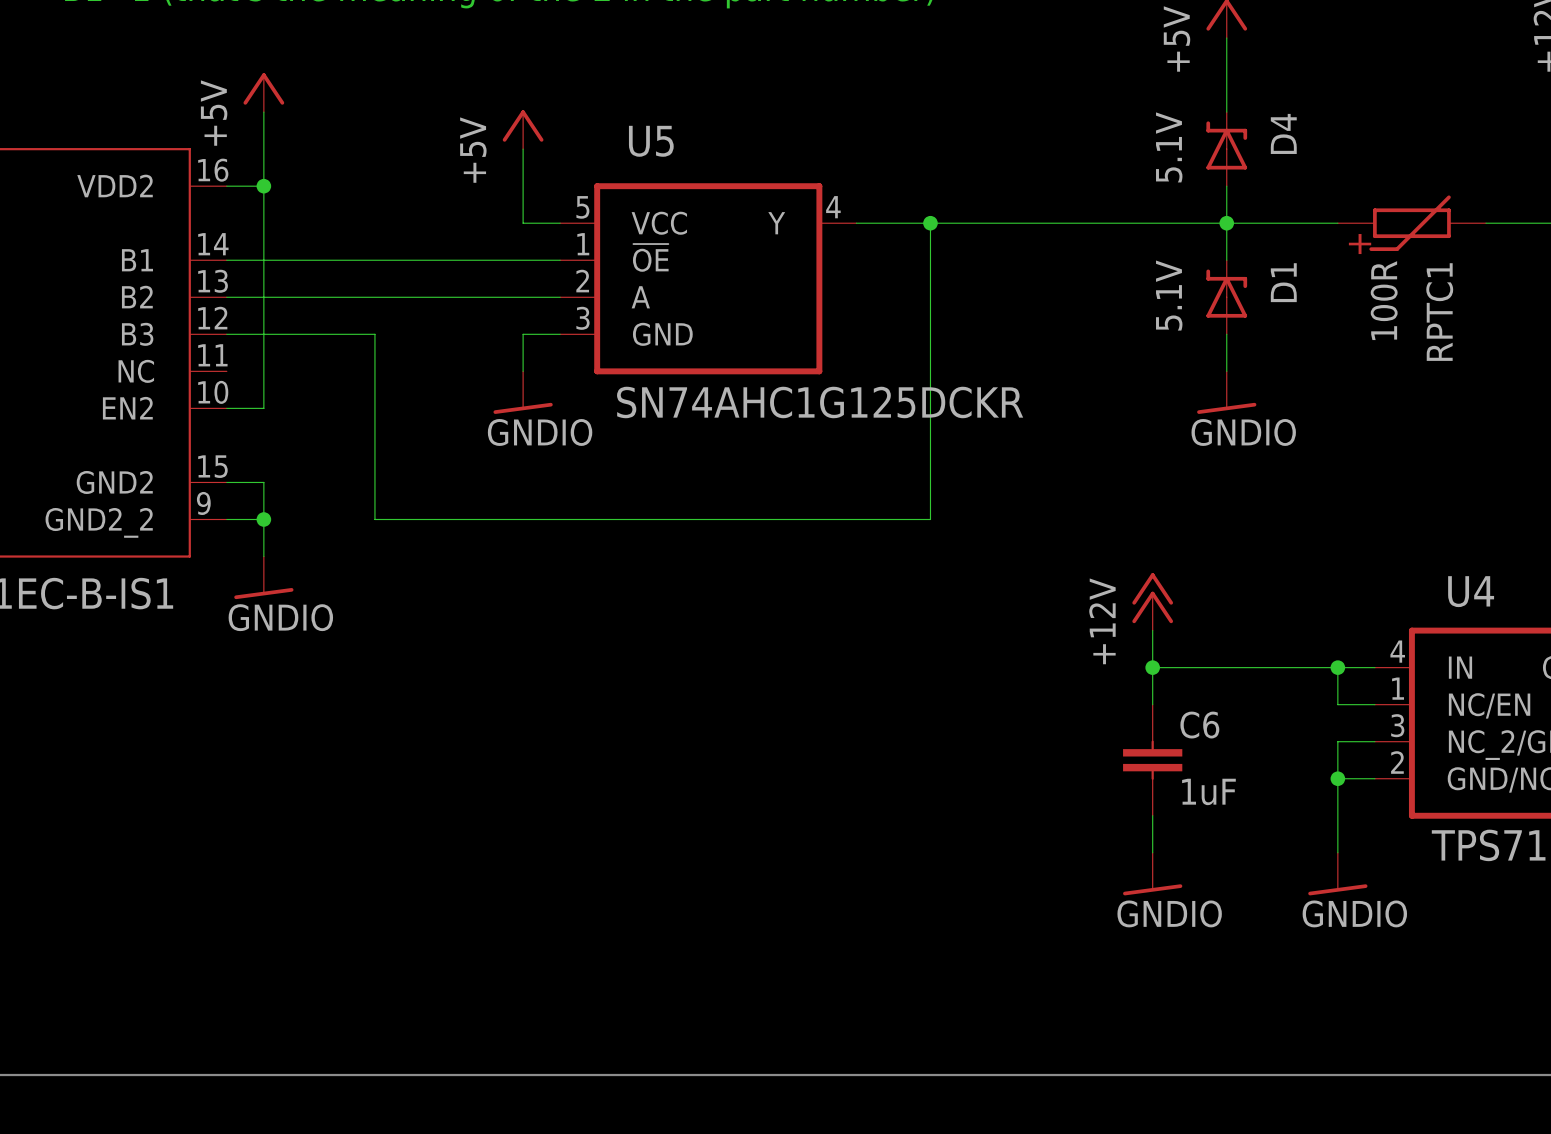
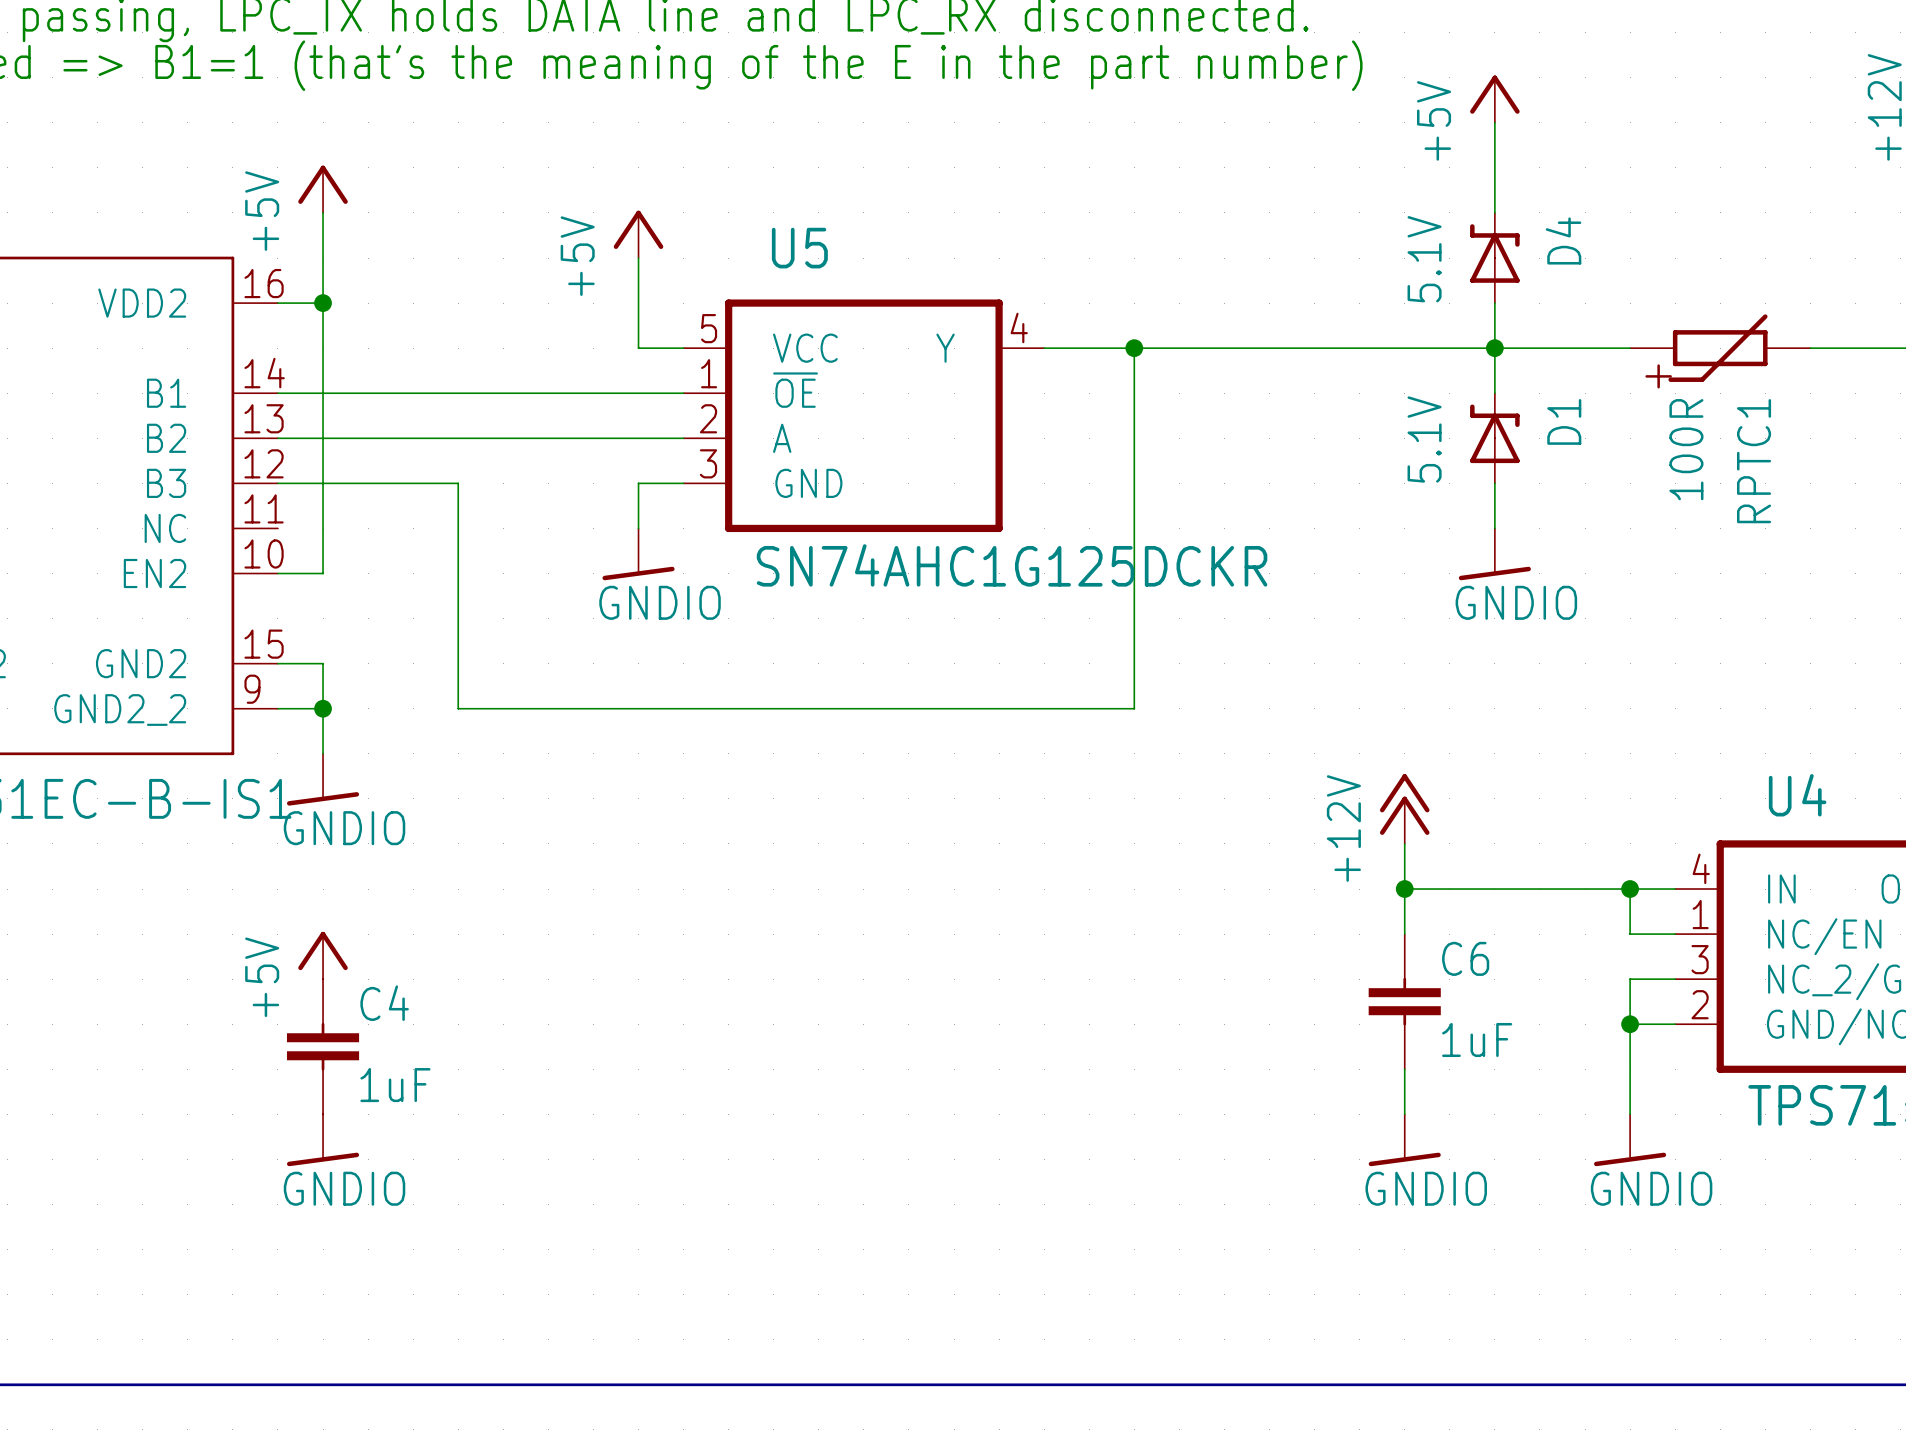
power symbol: none -> +5V (323, 955)
C4: none -> 1uF (323, 1046)
power symbol: none -> GNDIO (323, 1140)

